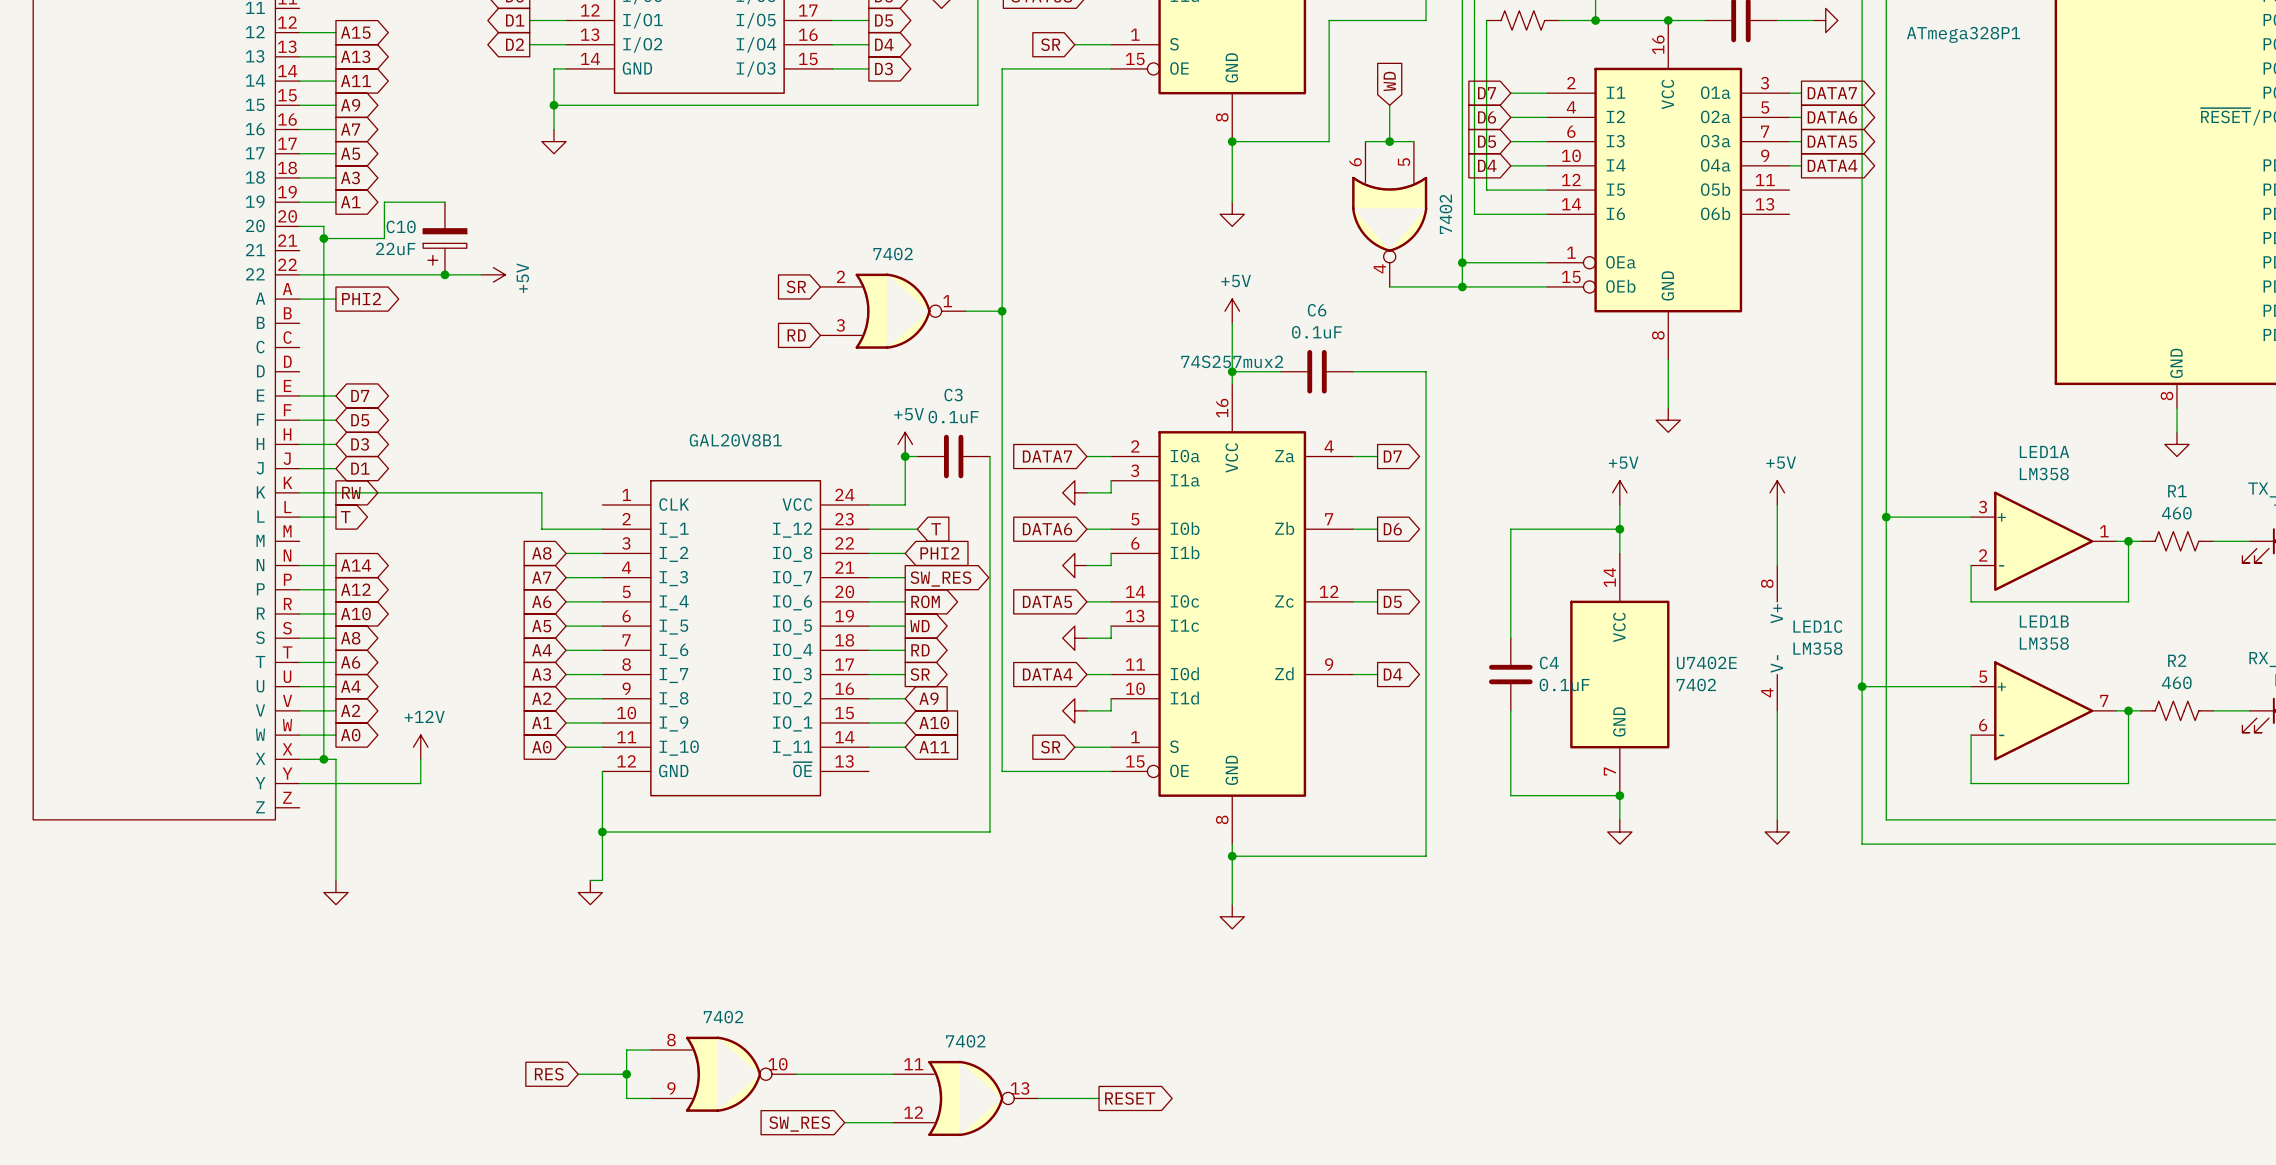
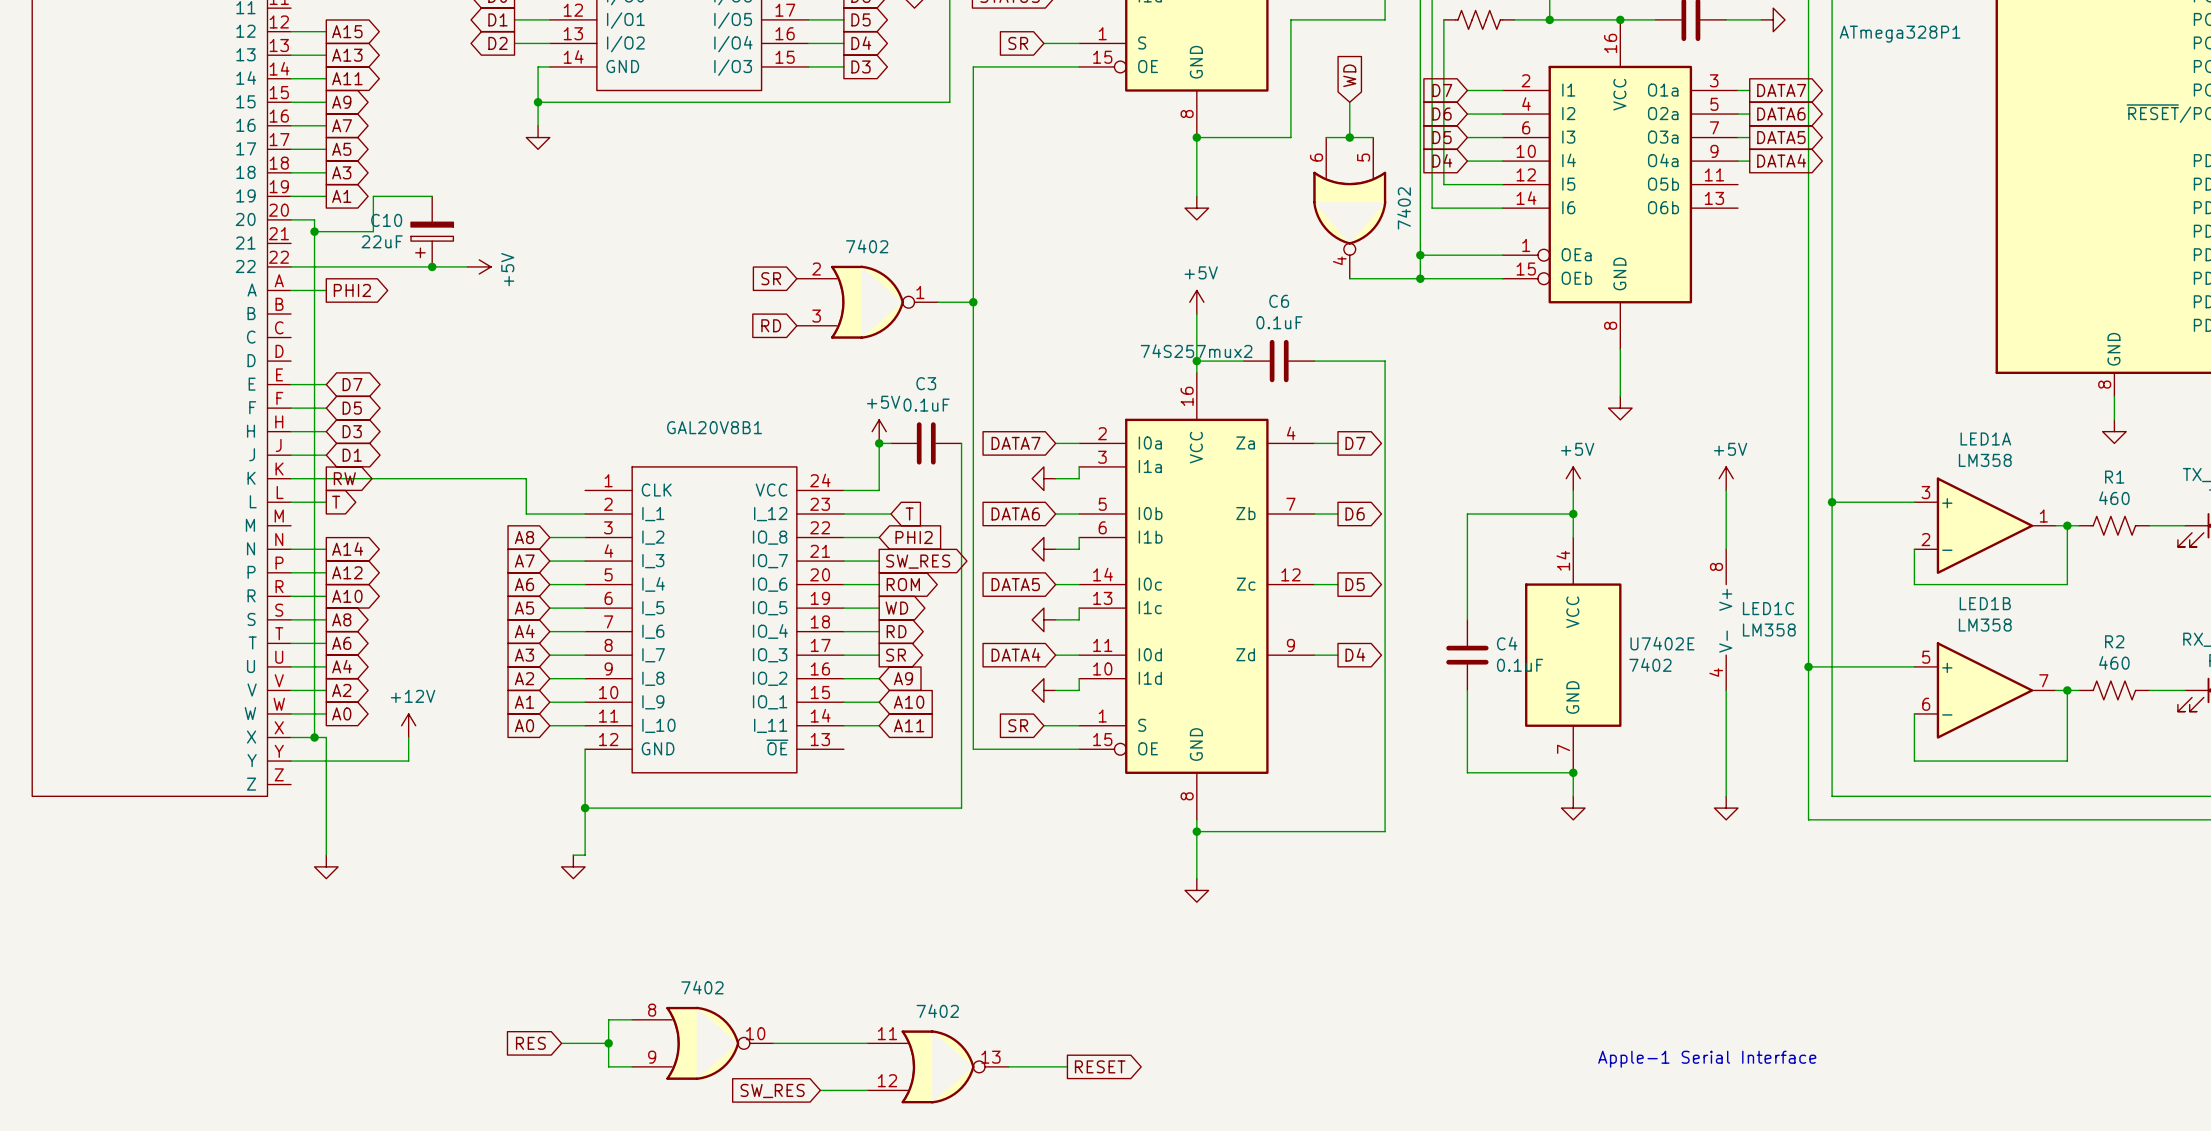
text: none -> Apple-1 Serial Interface (1707, 1059)

